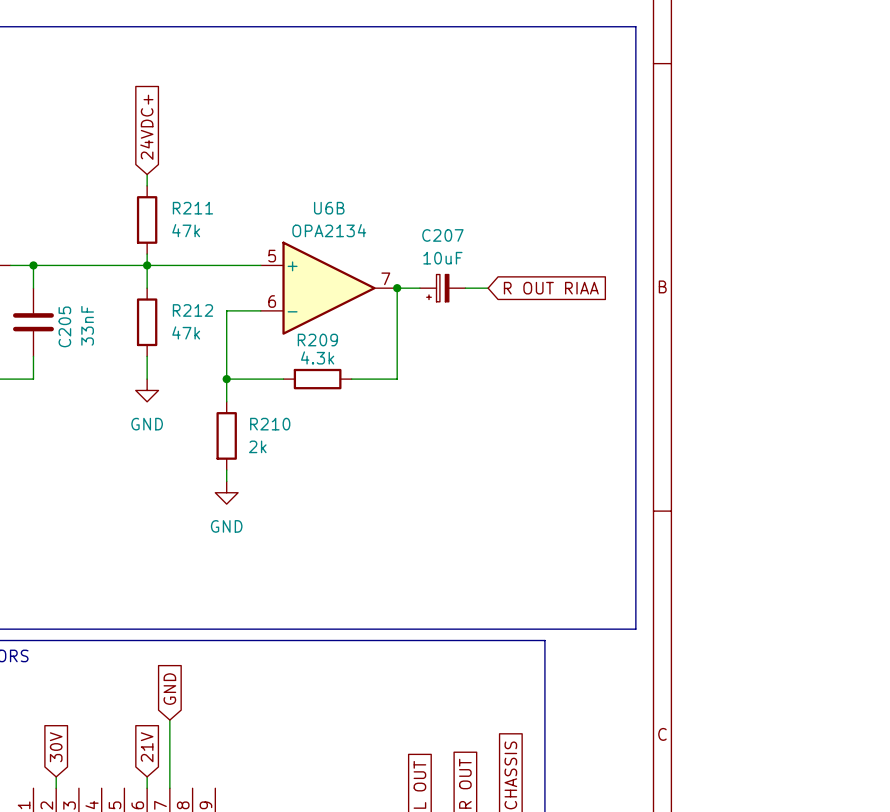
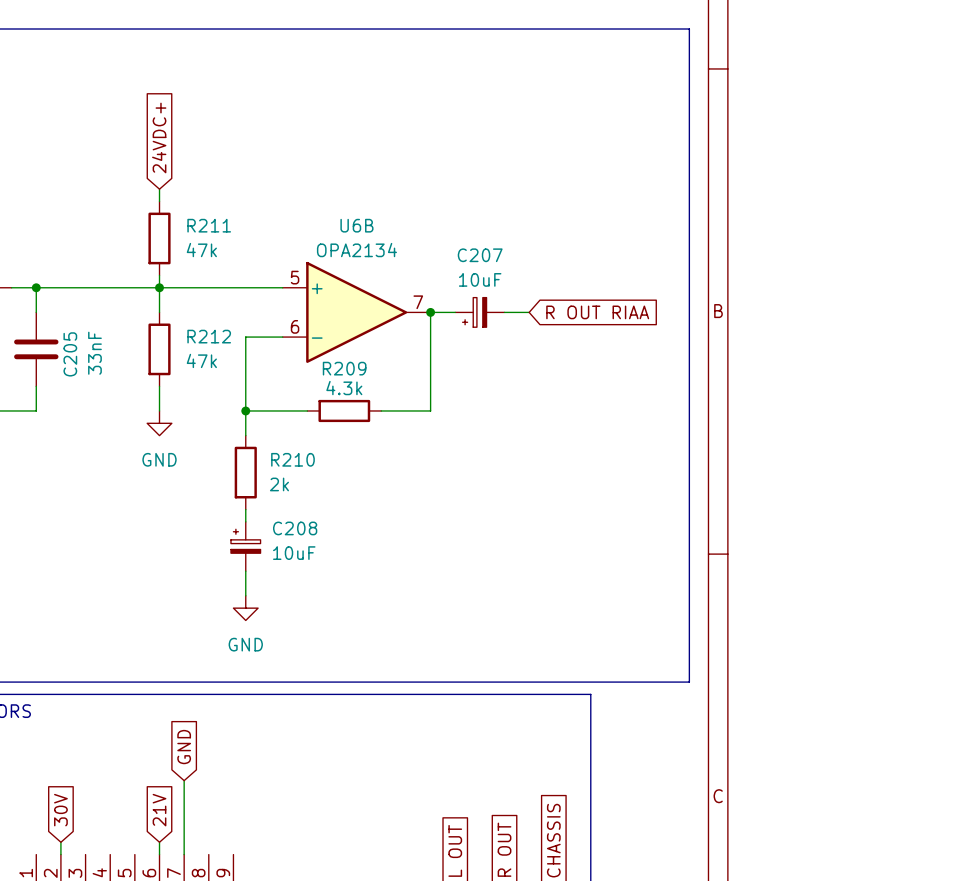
power symbol position: GND (226, 492) -> GND (245, 608)
C208: none -> 10uF (245, 546)
wire: none -> (245, 571) (245, 595)

